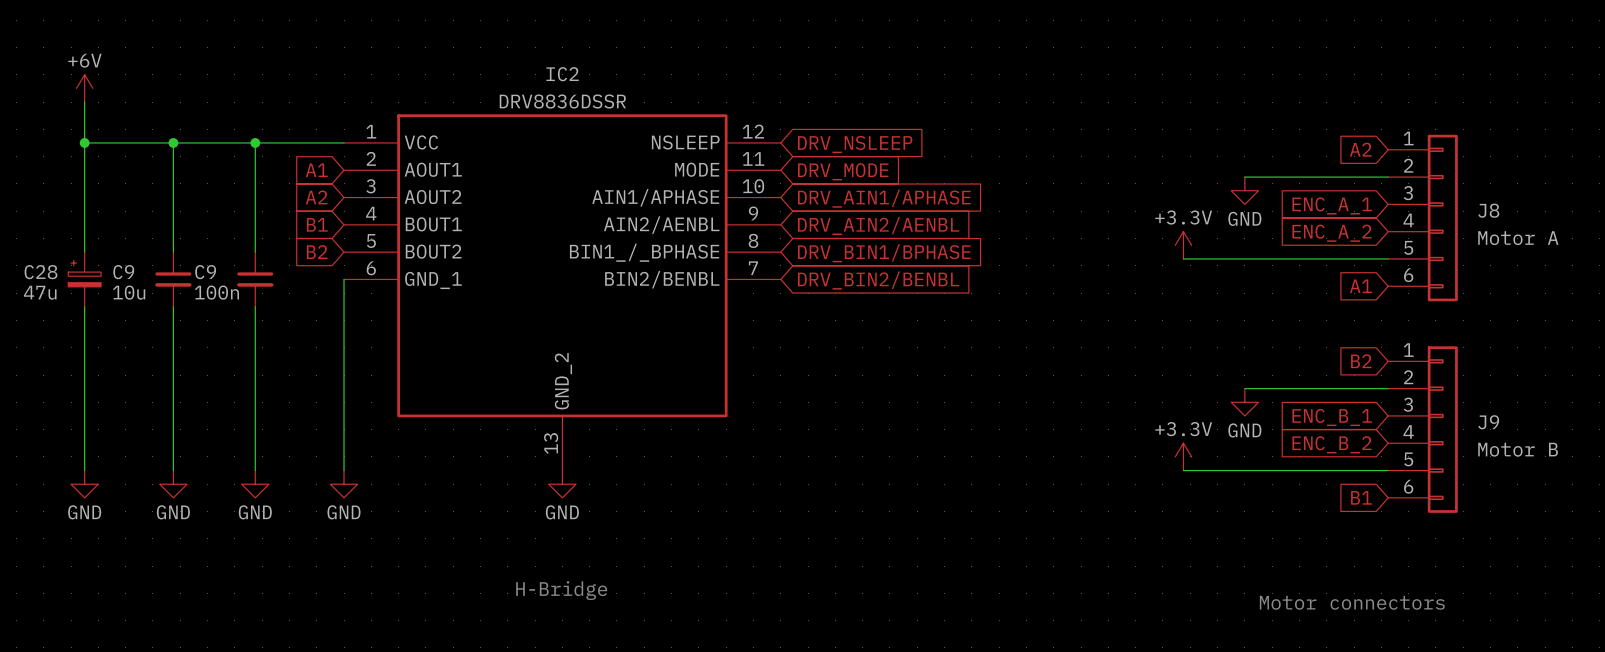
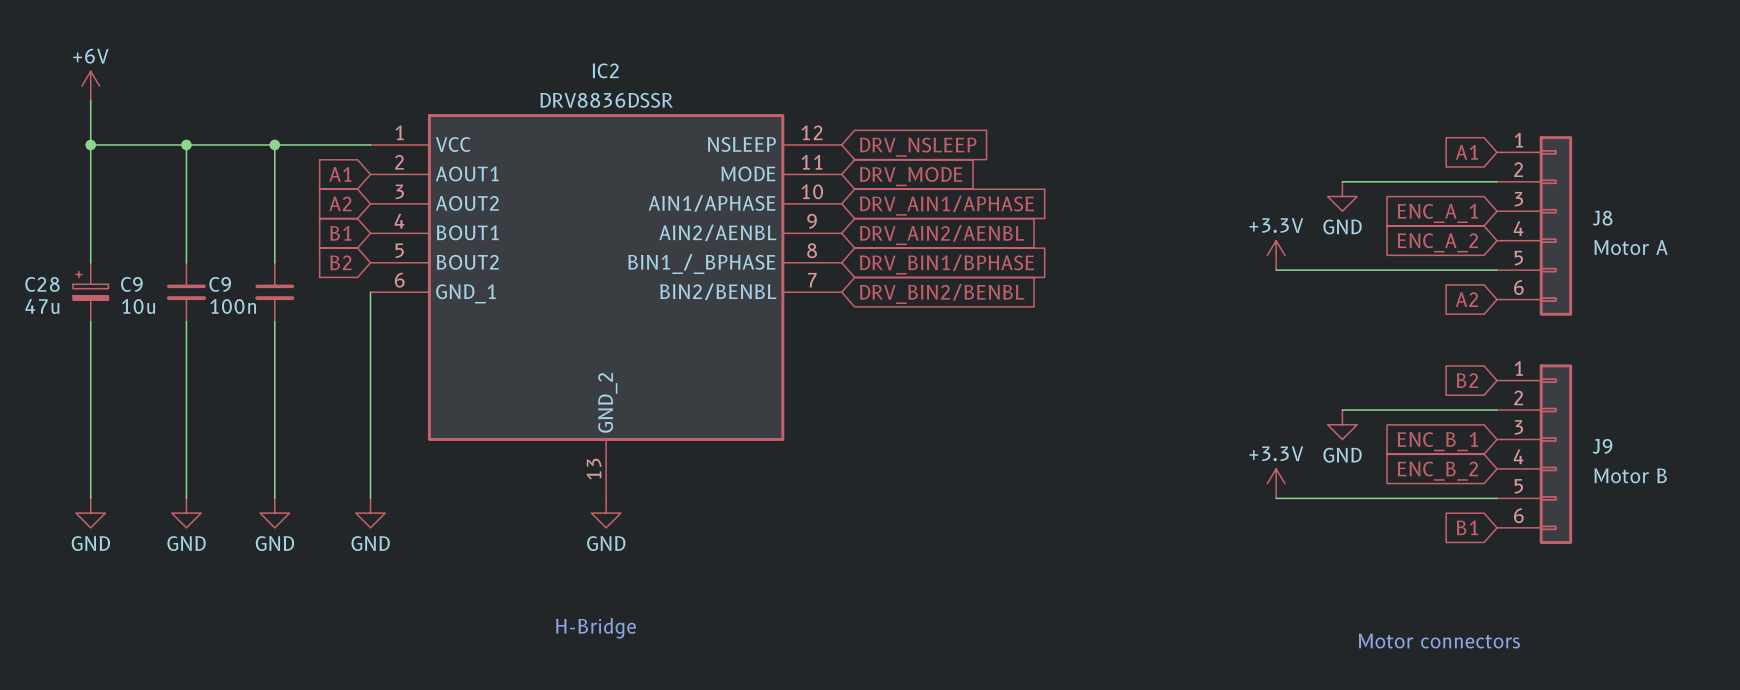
global label: A2 (1360, 149) -> A1 (1466, 152)
global label: A1 (1360, 286) -> A2 (1466, 299)

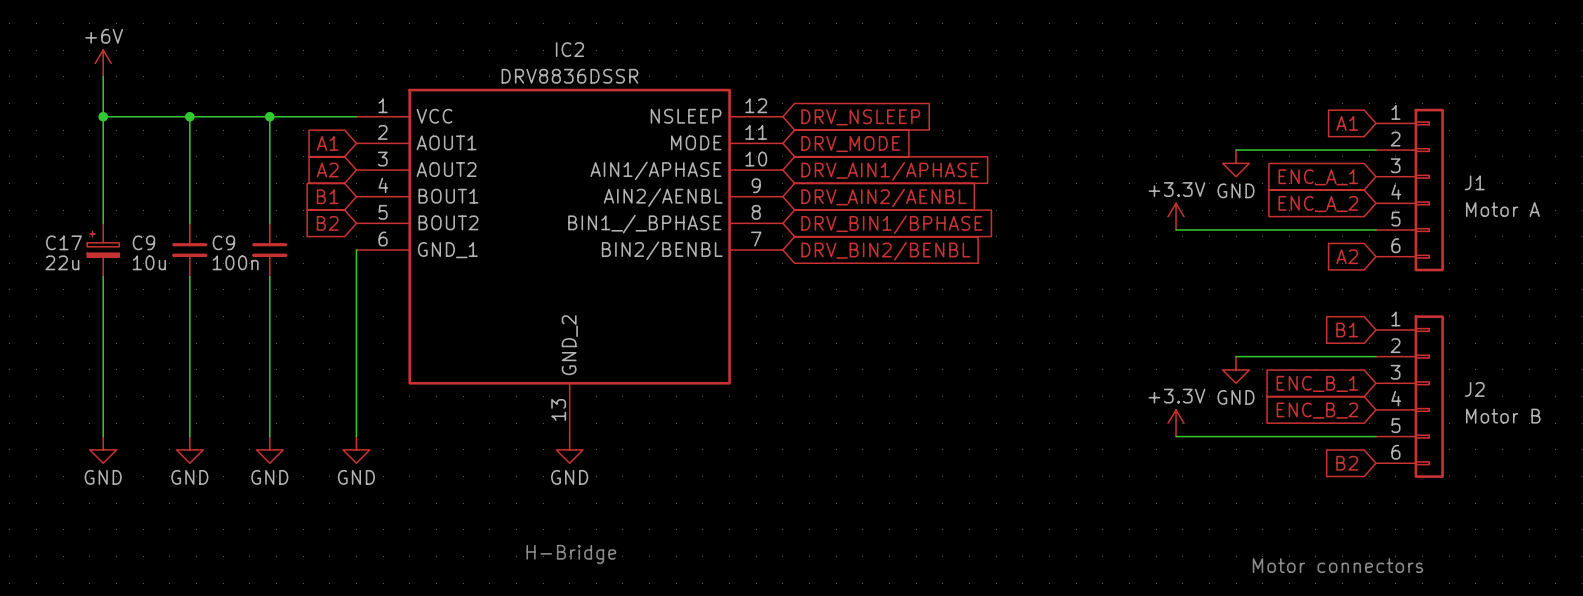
J8 name: J8 (1602, 218) -> J1 (1474, 182)
C28 name: C28 (42, 284) -> C17 (63, 242)
C28 value: 47u (42, 306) -> 22u (62, 262)
global label: B2 (1467, 380) -> B1 (1347, 329)
J9 name: J9 (1602, 446) -> J2 (1474, 389)
global label: B1 (1467, 527) -> B2 (1347, 463)

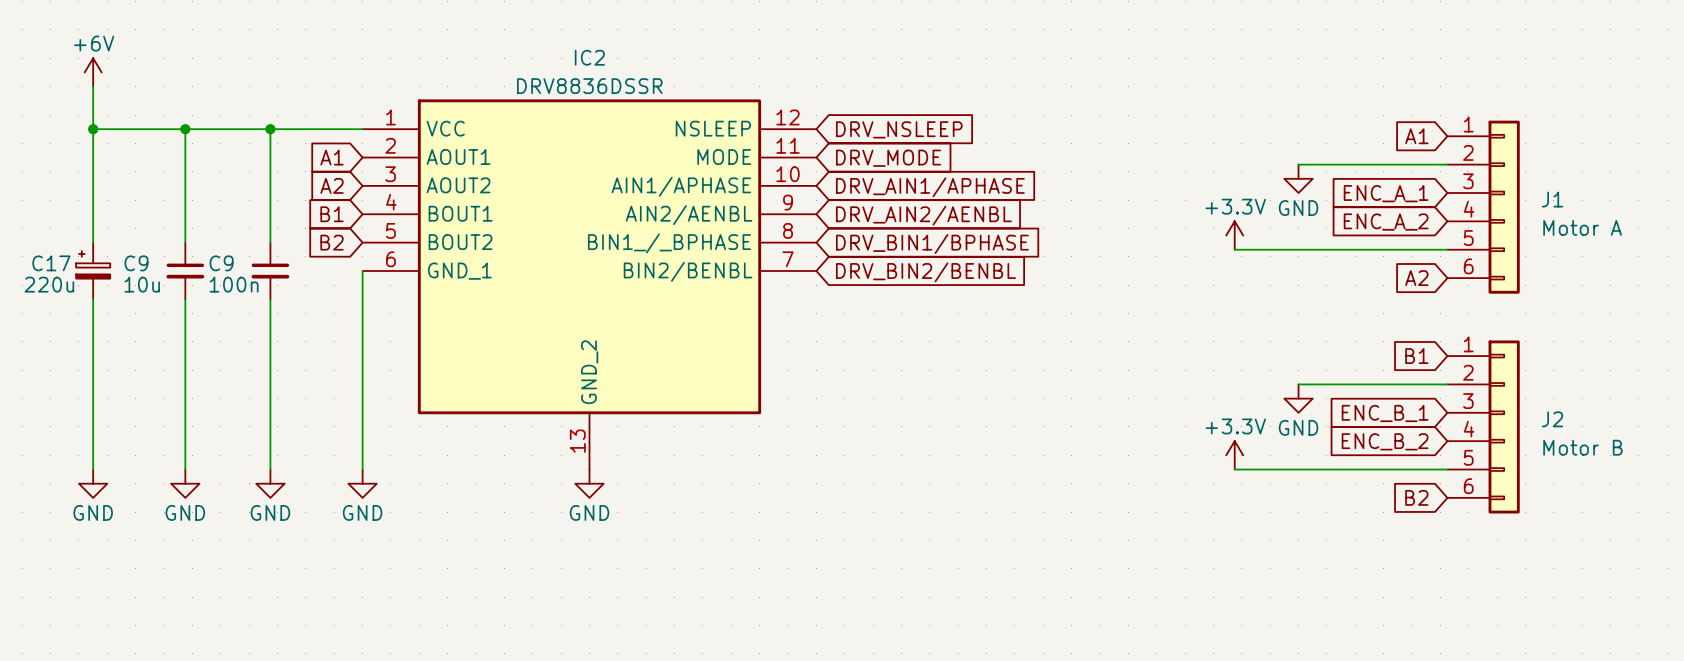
C17 value: 22u (62, 262) -> 220u (49, 284)
text: H-Bridge (571, 554) -> none
text: Motor connectors (1337, 565) -> none

